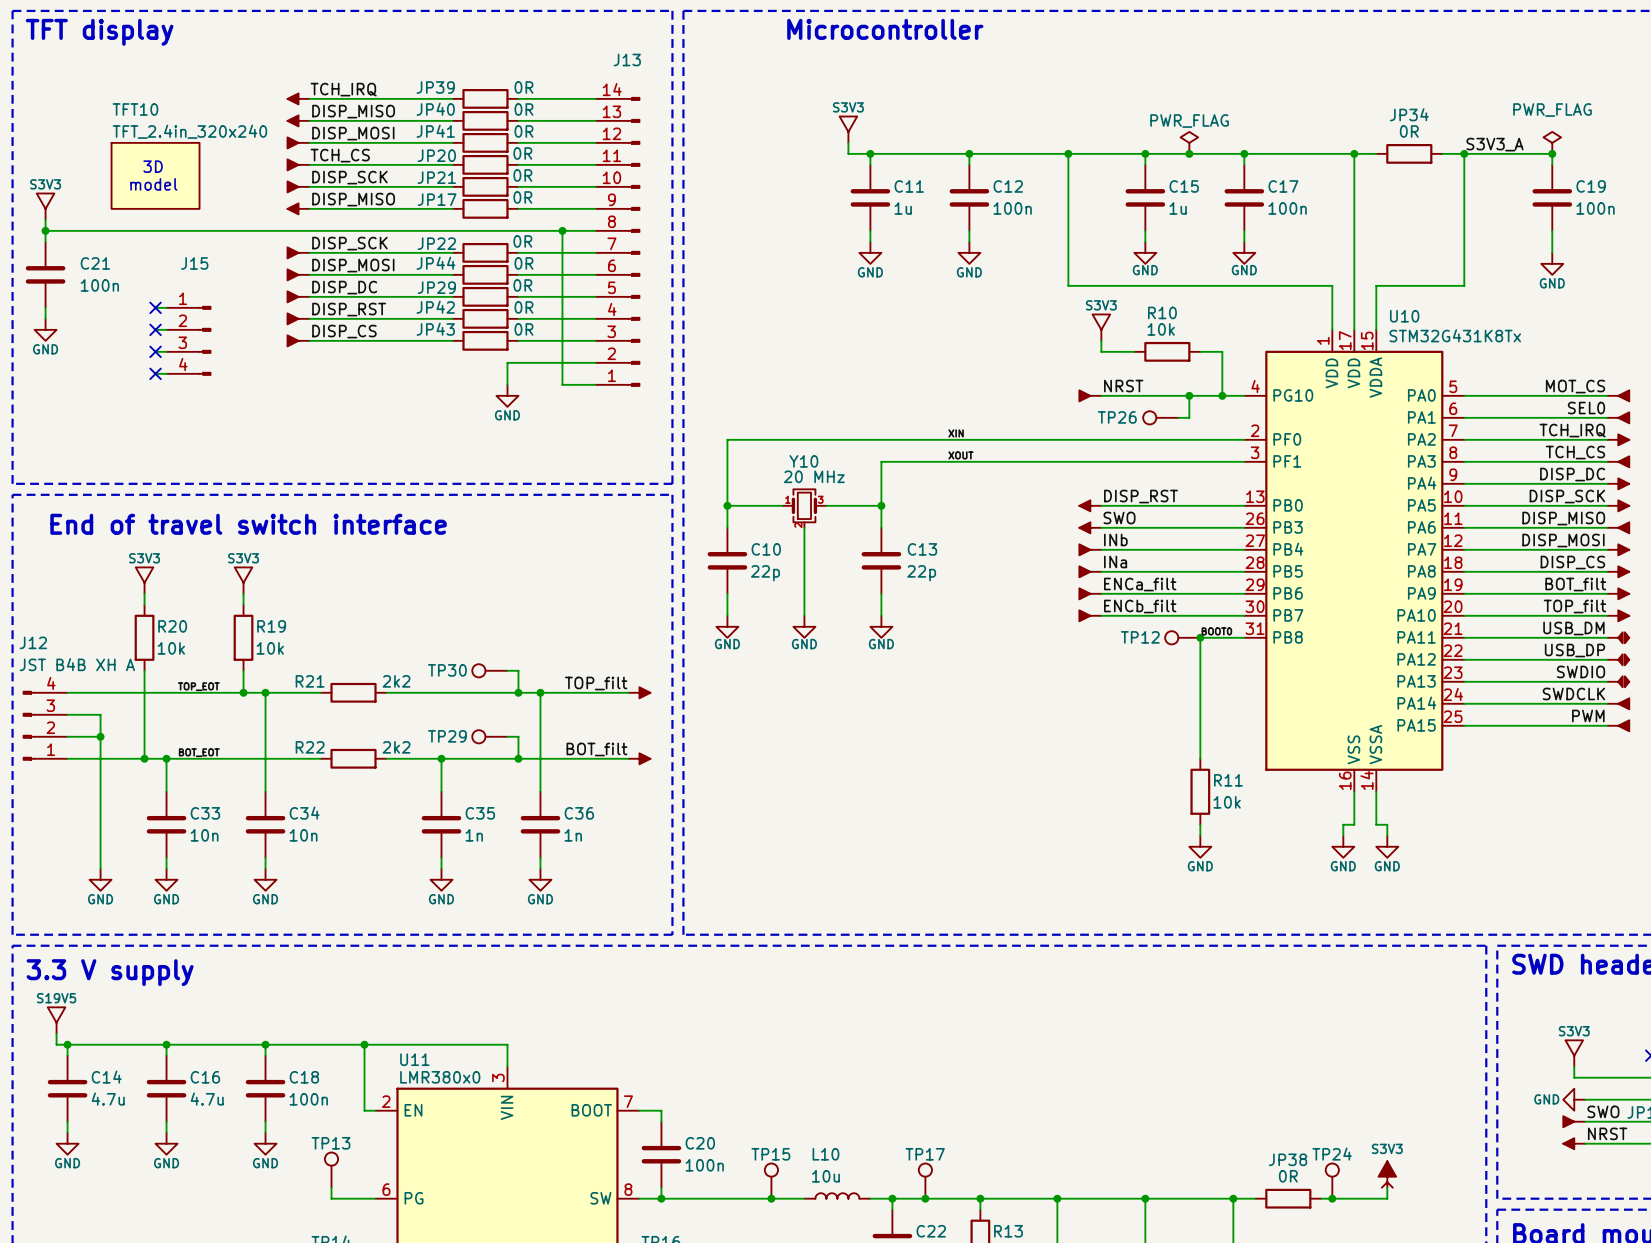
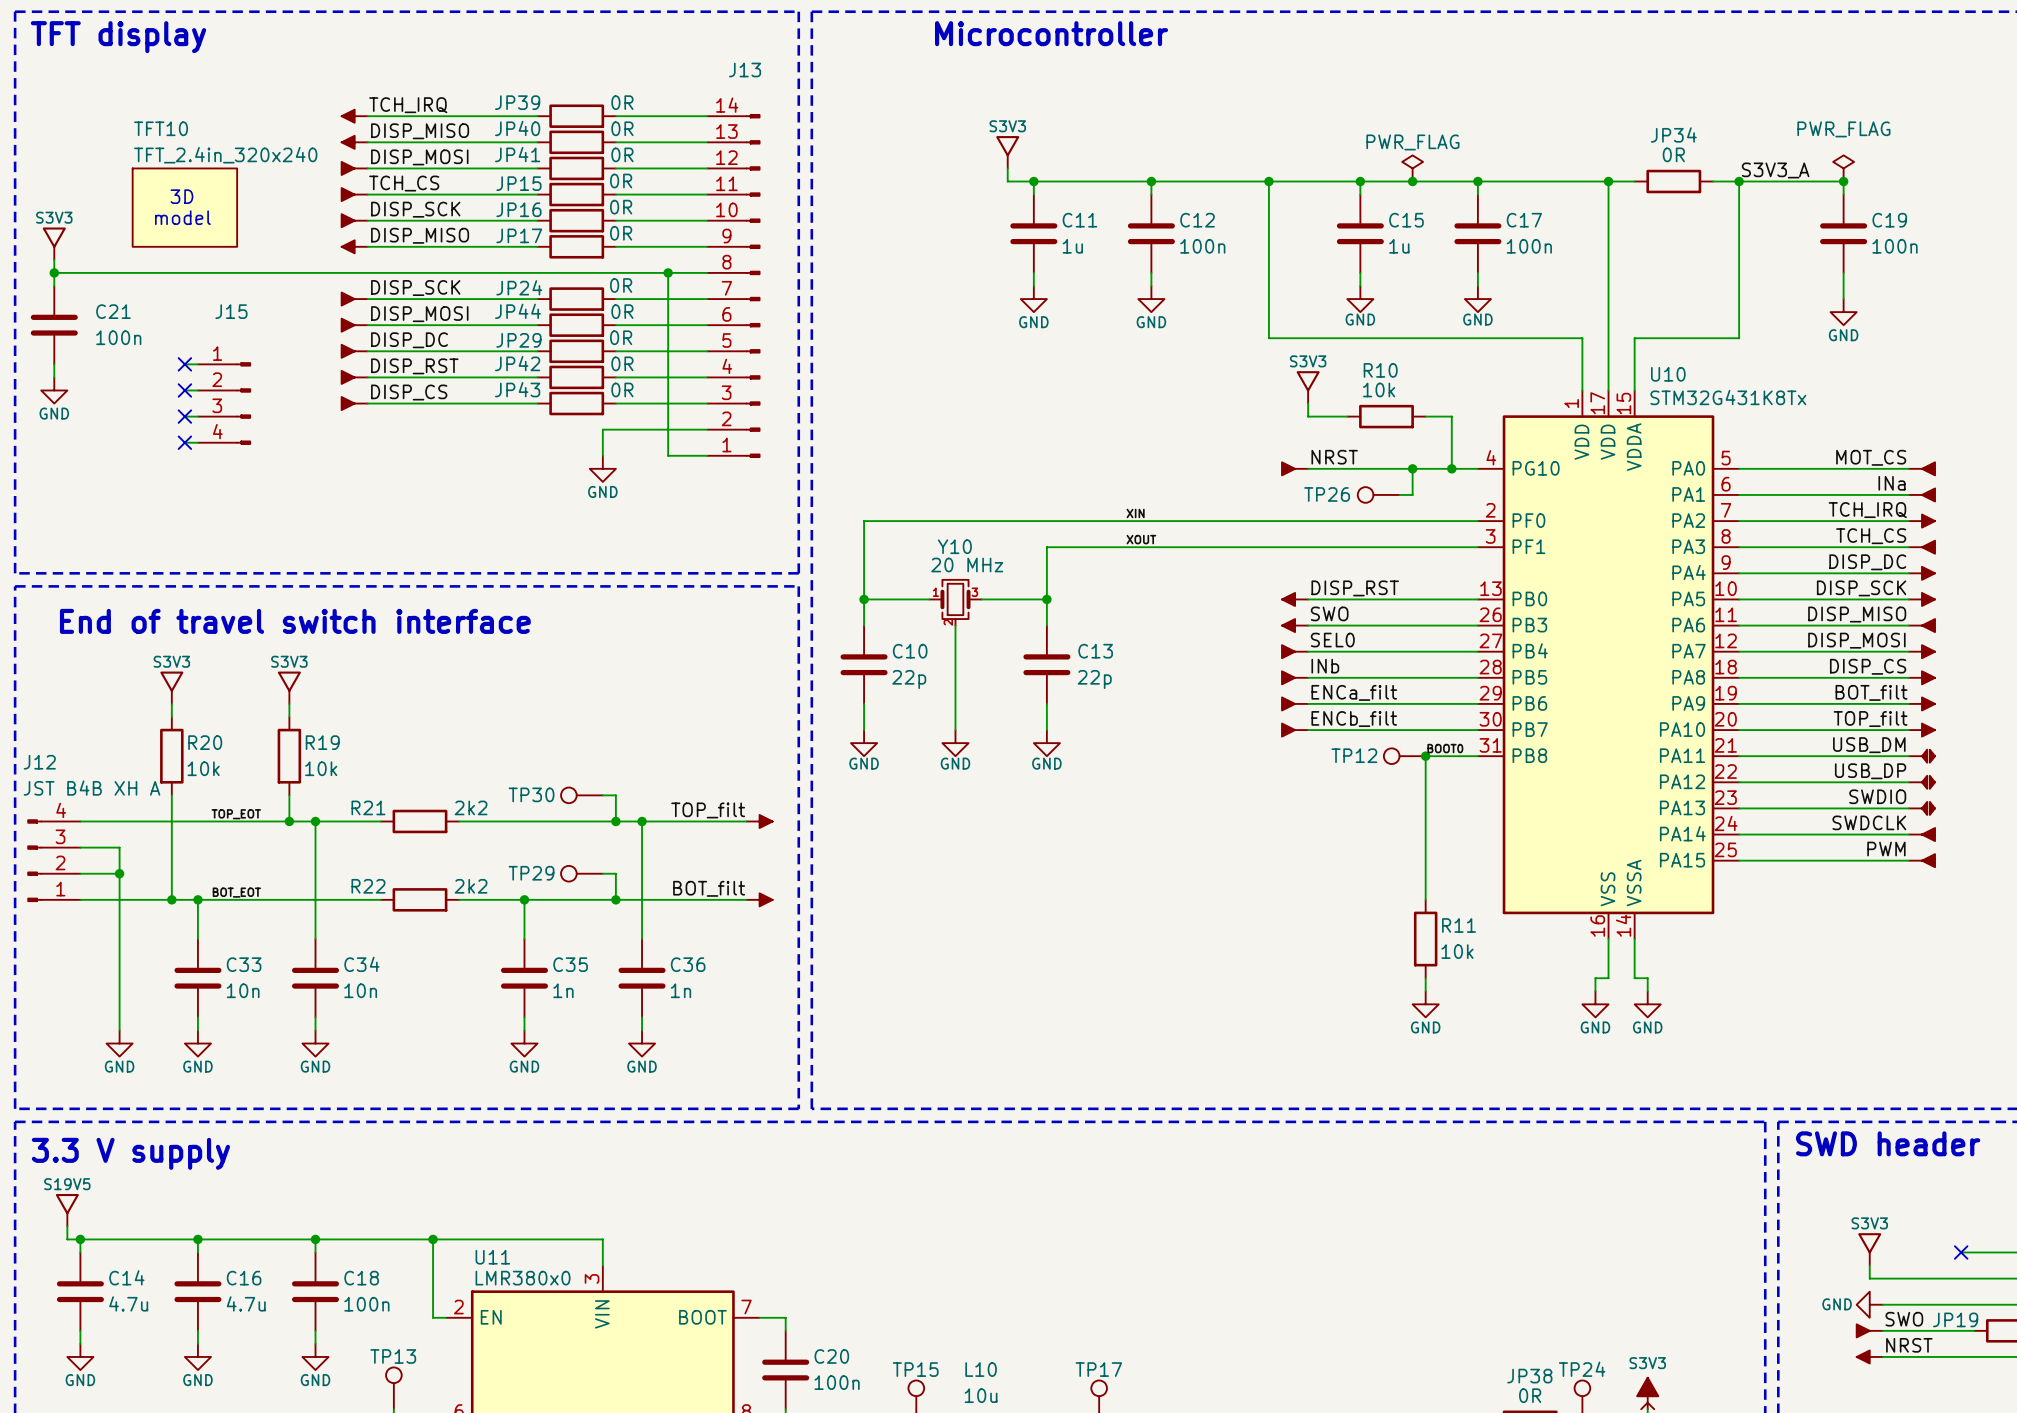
JP20 name: JP20 (436, 155) -> JP15 (518, 183)
JP21 name: JP21 (436, 177) -> JP16 (518, 209)
JP22 name: JP22 (436, 243) -> JP24 (519, 287)
label: SEL0 (1586, 408) -> INa (1892, 483)
label: INb (1115, 540) -> SEL0 (1332, 640)
label: INa (1115, 562) -> INb (1325, 666)

